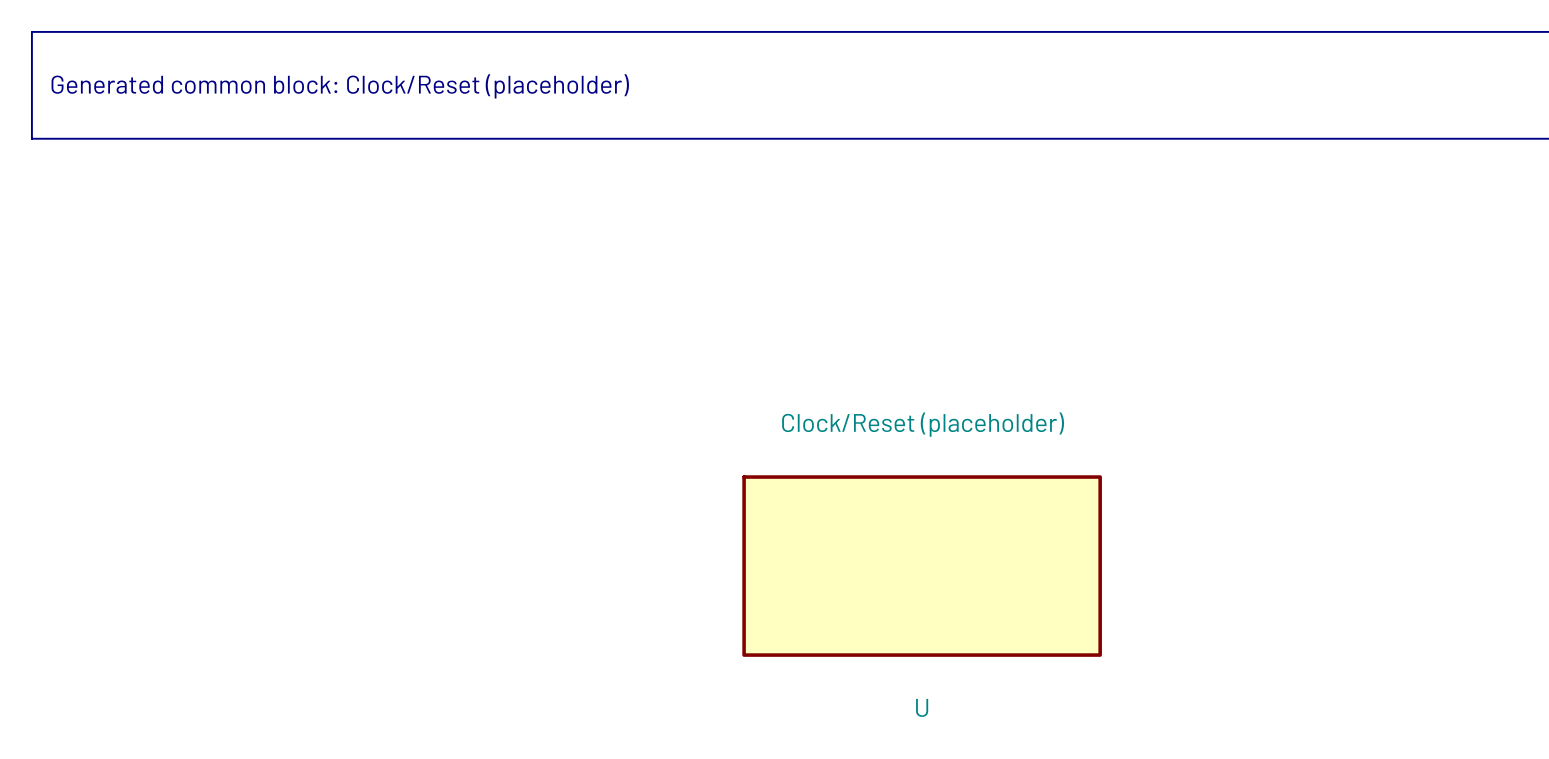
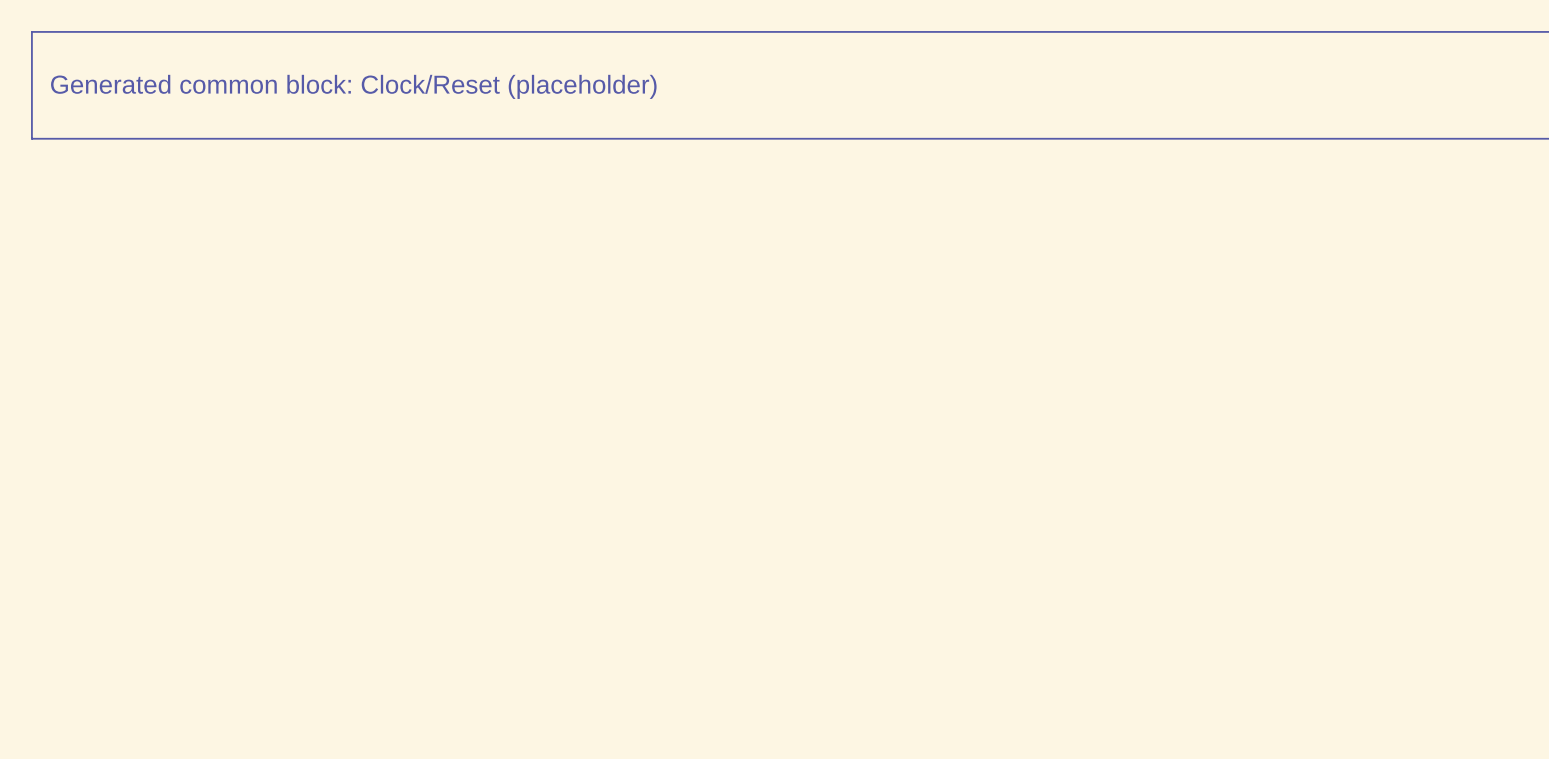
U: Clock/Reset (placeholder) (922, 566) -> none

